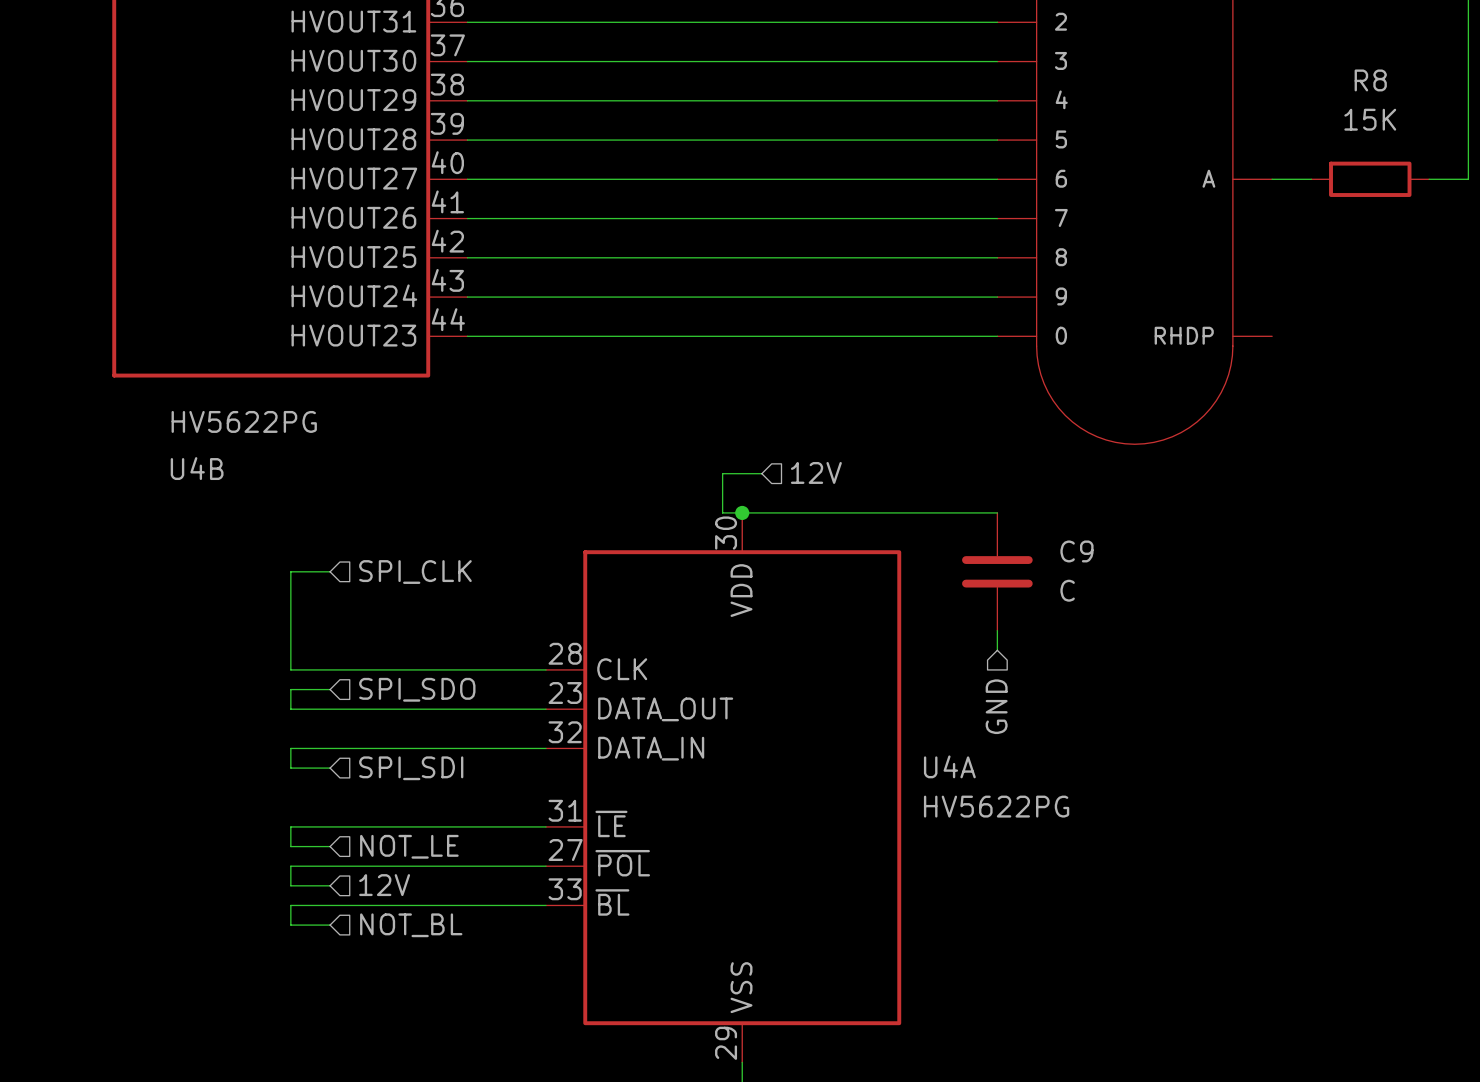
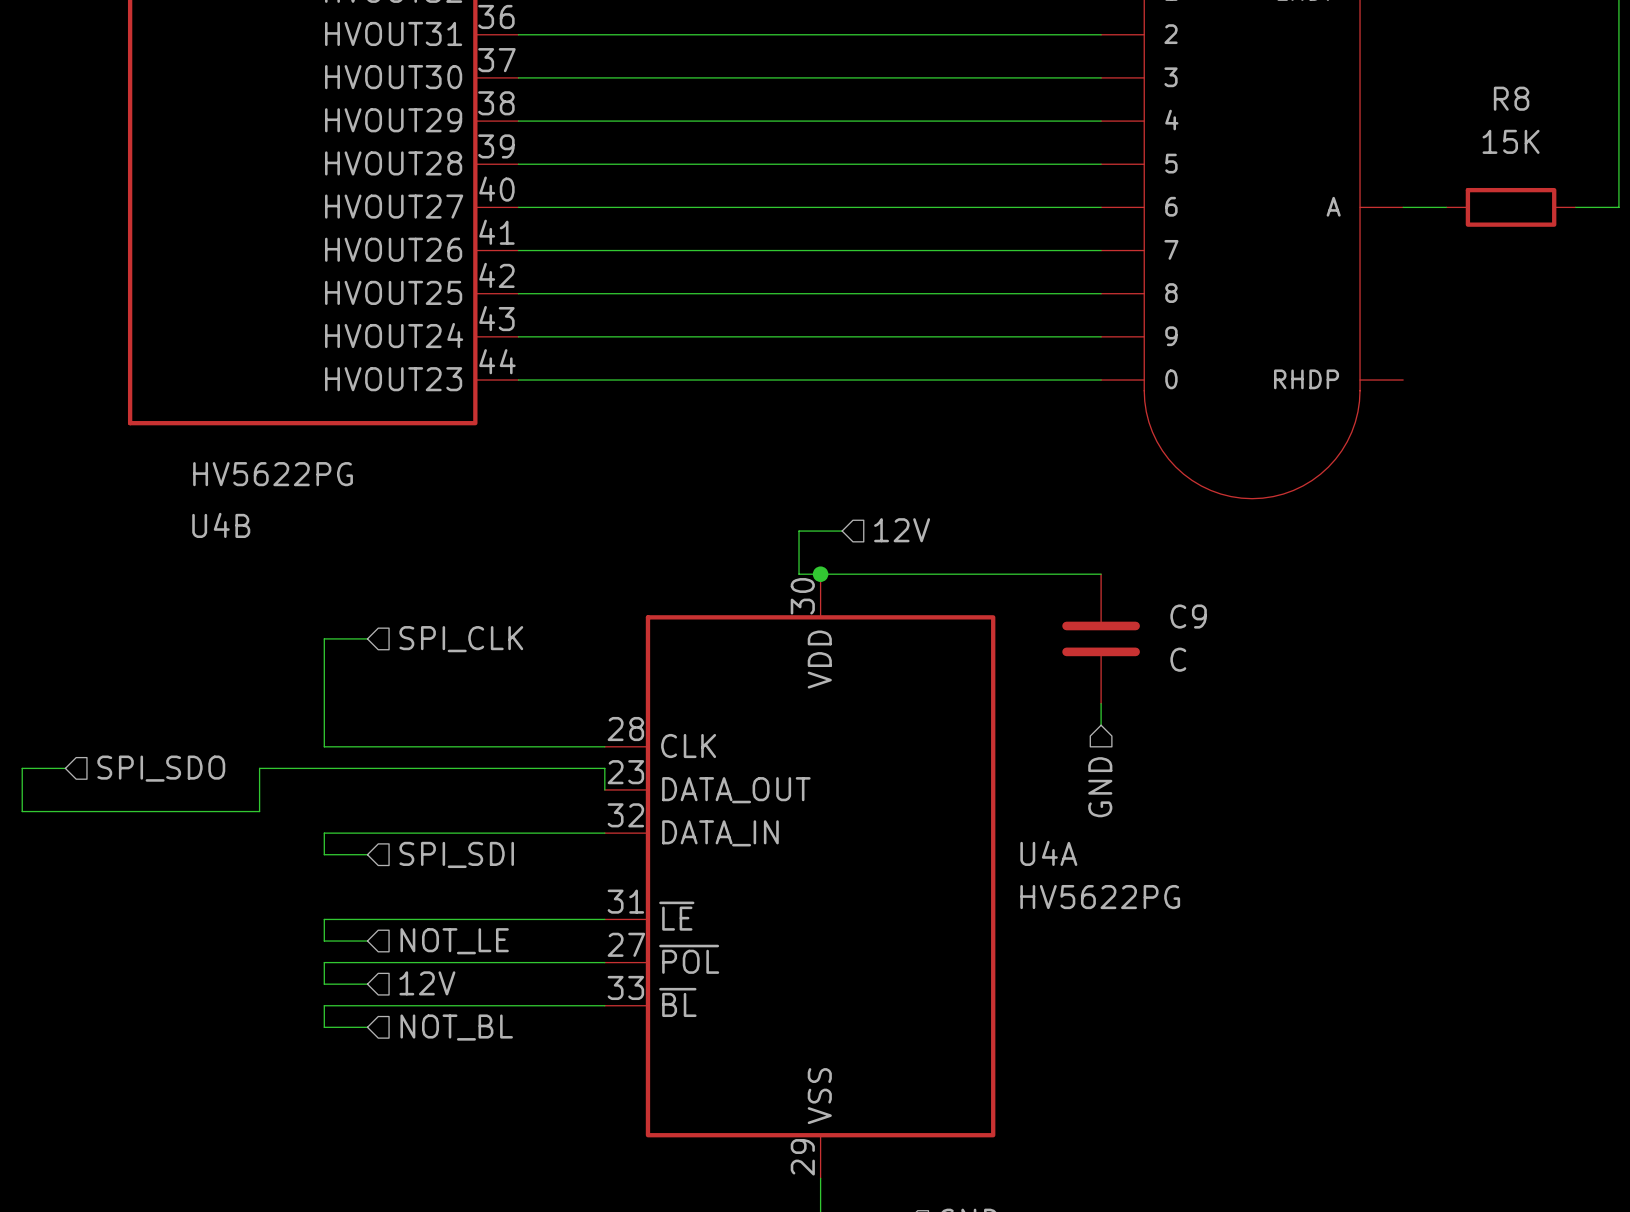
wire: none -> (65, 768) (22, 768) (22, 811) (259, 811) (259, 768) (324, 768)
wire: (290, 689) (290, 709) (545, 709) -> (367, 768) (604, 768) (604, 789)
hierarchical label position: SPI_SDO (417, 689) -> SPI_SDO (161, 768)

